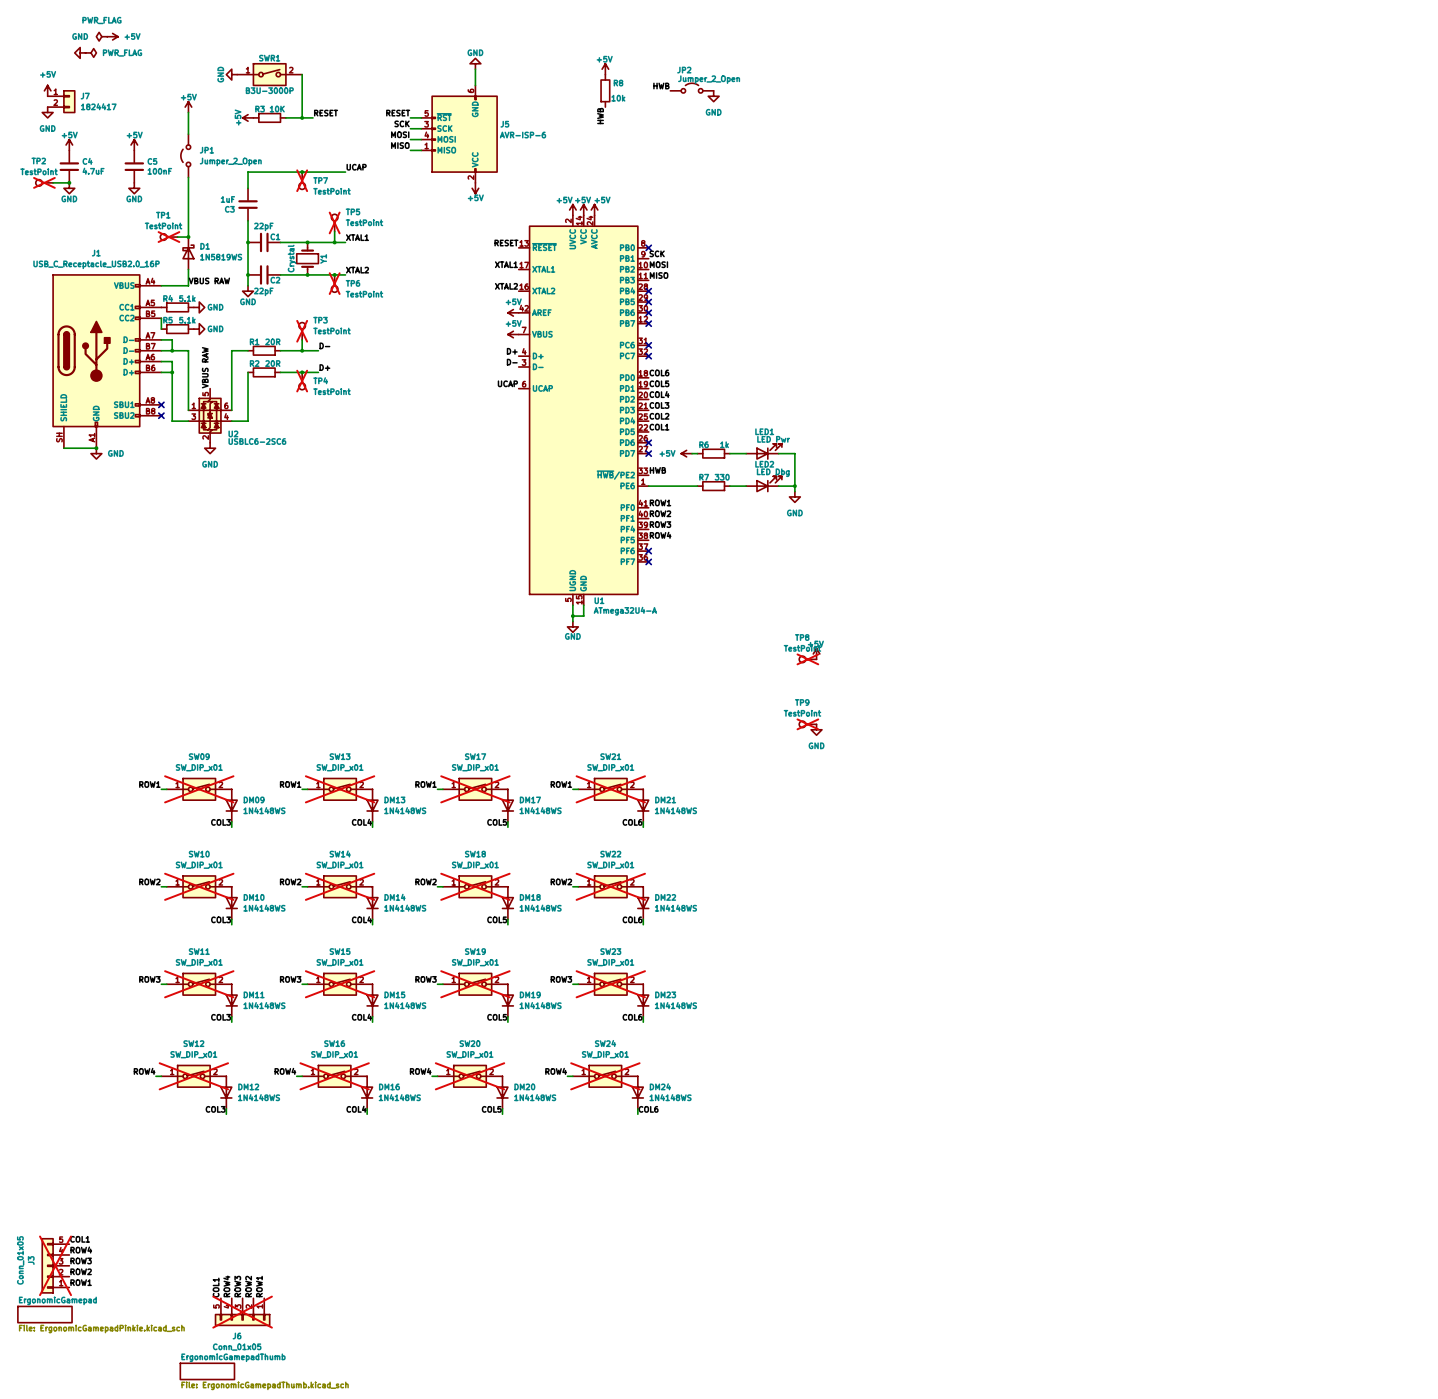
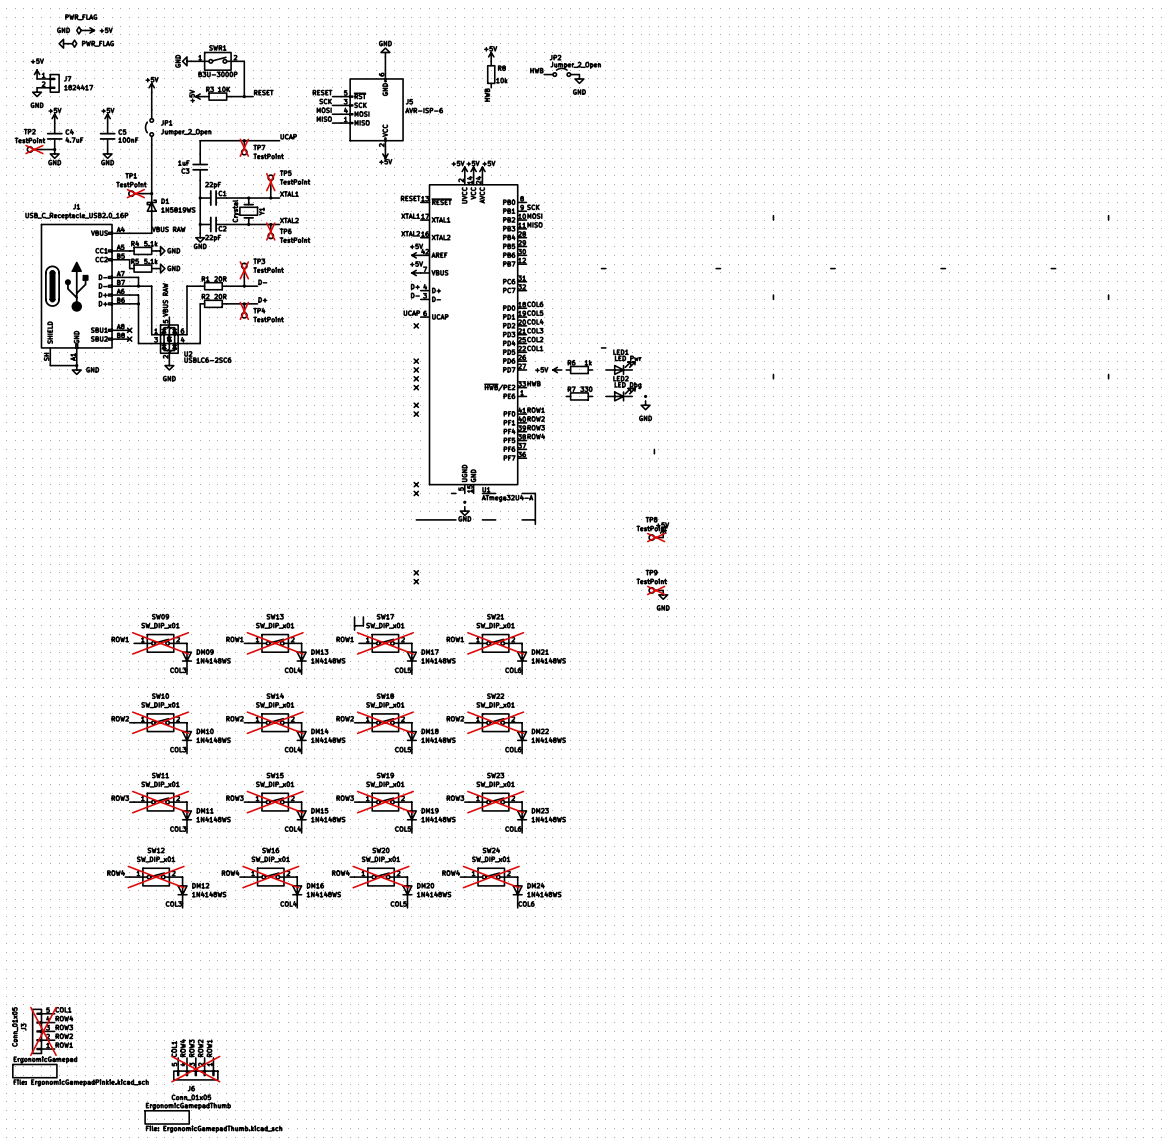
no-connect mark: (648, 247) -> none
wire: none -> (773, 215) (773, 220)
wire: none -> (1108, 215) (1108, 220)
no-connect mark: (648, 291) -> none
no-connect mark: (648, 302) -> none
no-connect mark: (648, 312) -> none
no-connect mark: (648, 323) -> none
wire: none -> (601, 268) (605, 268)
wire: none -> (716, 268) (720, 268)
wire: none -> (830, 268) (835, 268)
wire: none -> (941, 268) (945, 268)
wire: none -> (1051, 268) (1055, 268)
no-connect mark: (648, 345) -> none
no-connect mark: (648, 356) -> none
wire: none -> (773, 295) (773, 299)
wire: none -> (1108, 295) (1108, 299)
no-connect mark: none -> (416, 325)
no-connect mark: none -> (416, 361)
no-connect mark: (648, 442) -> none
no-connect mark: none -> (416, 369)
no-connect mark: (648, 453) -> none
wire: (692, 453) (697, 453) -> (601, 347) (605, 347)
wire: (729, 453) (746, 453) -> none
wire: (778, 453) (794, 453) (794, 491) -> none
wire: none -> (773, 374) (773, 378)
wire: none -> (1108, 374) (1108, 378)
no-connect mark: none -> (416, 378)
no-connect mark: none -> (416, 387)
wire: (648, 486) (697, 486) -> none
wire: (729, 486) (746, 486) -> none
wire: (778, 486) (794, 486) -> none
no-connect mark: none -> (416, 405)
no-connect mark: none -> (416, 414)
no-connect mark: (648, 551) -> none
wire: none -> (654, 449) (654, 453)
no-connect mark: (648, 561) -> none
no-connect mark: none -> (416, 484)
no-connect mark: none -> (416, 493)
wire: none -> (451, 493) (455, 493)
wire: (572, 605) (572, 621) -> none
wire: (583, 605) (583, 616) (572, 616) -> none
wire: none -> (482, 493) (495, 493)
wire: none -> (522, 493) (535, 493) (535, 524)
wire: none -> (416, 519) (455, 519)
wire: none -> (482, 519) (495, 519)
wire: none -> (522, 519) (535, 519)
no-connect mark: none -> (416, 572)
no-connect mark: none -> (416, 581)
wire: none -> (354, 616) (354, 630)
wire: none -> (363, 616) (363, 625) (354, 625)
wire: (161, 789) (166, 789) -> none
wire: (437, 789) (442, 789) -> none
wire: (572, 789) (578, 789) -> none

